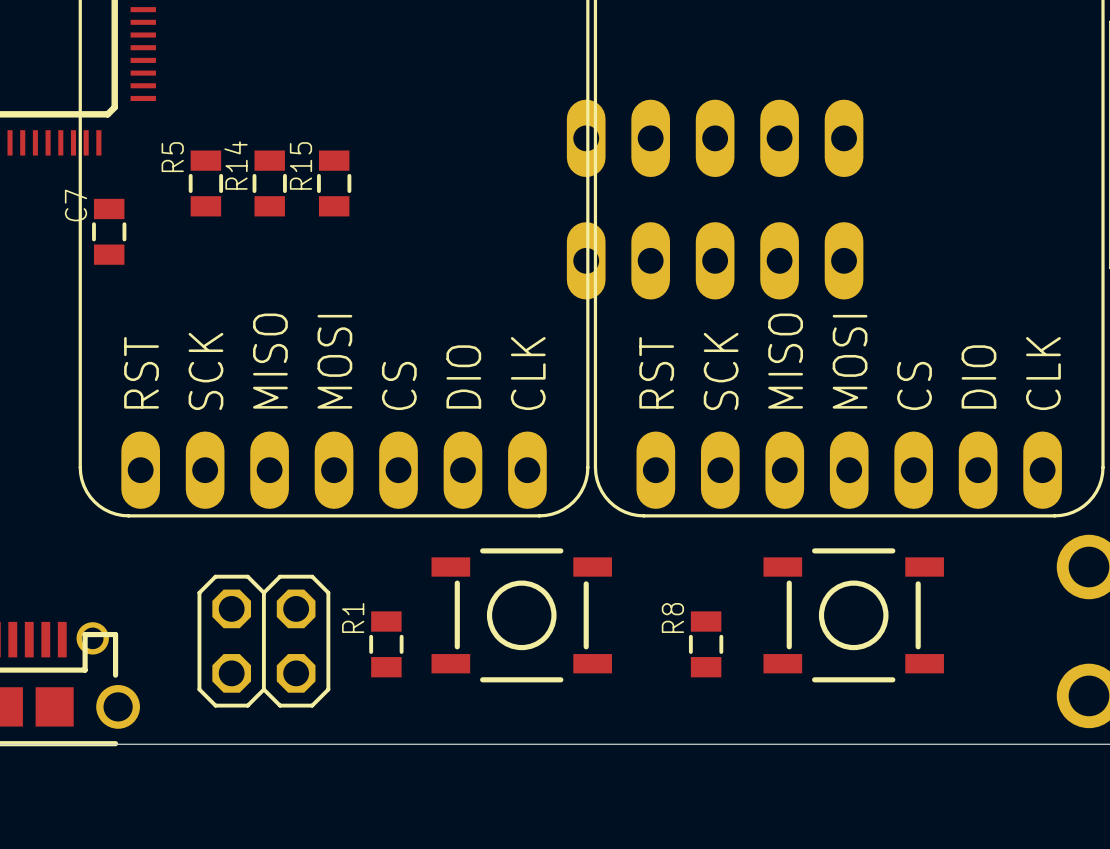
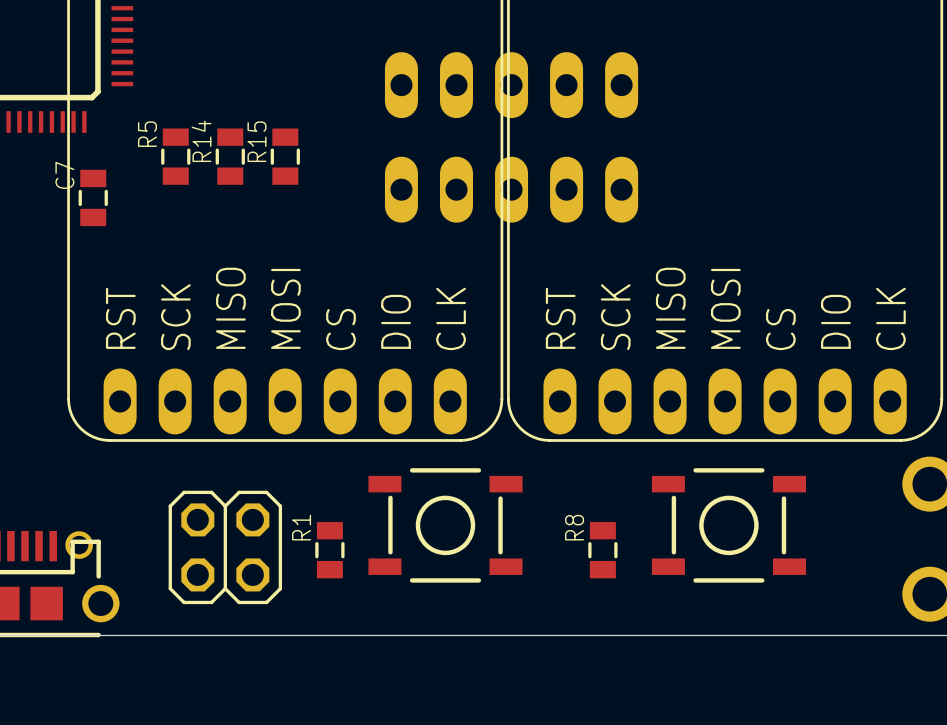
part: none -> (511, 85)
part: (715, 138) -> none
part: none -> (511, 189)
part: (715, 260) -> none

